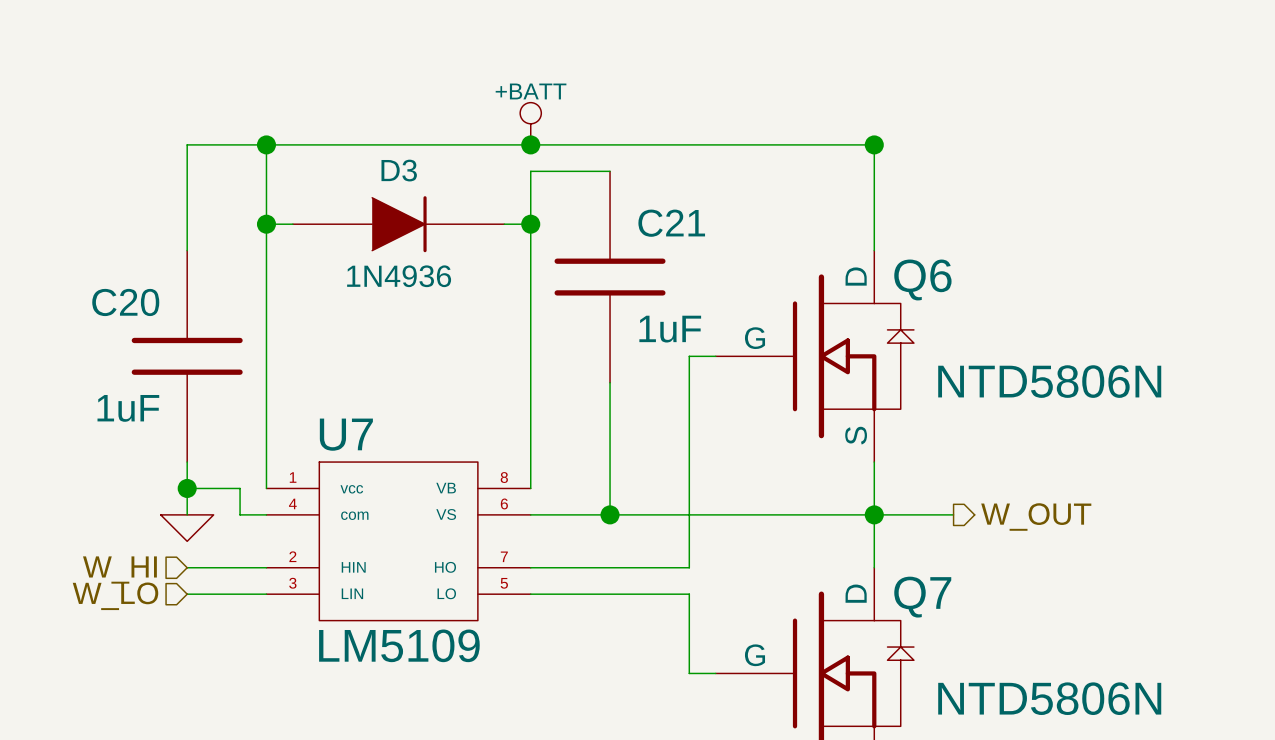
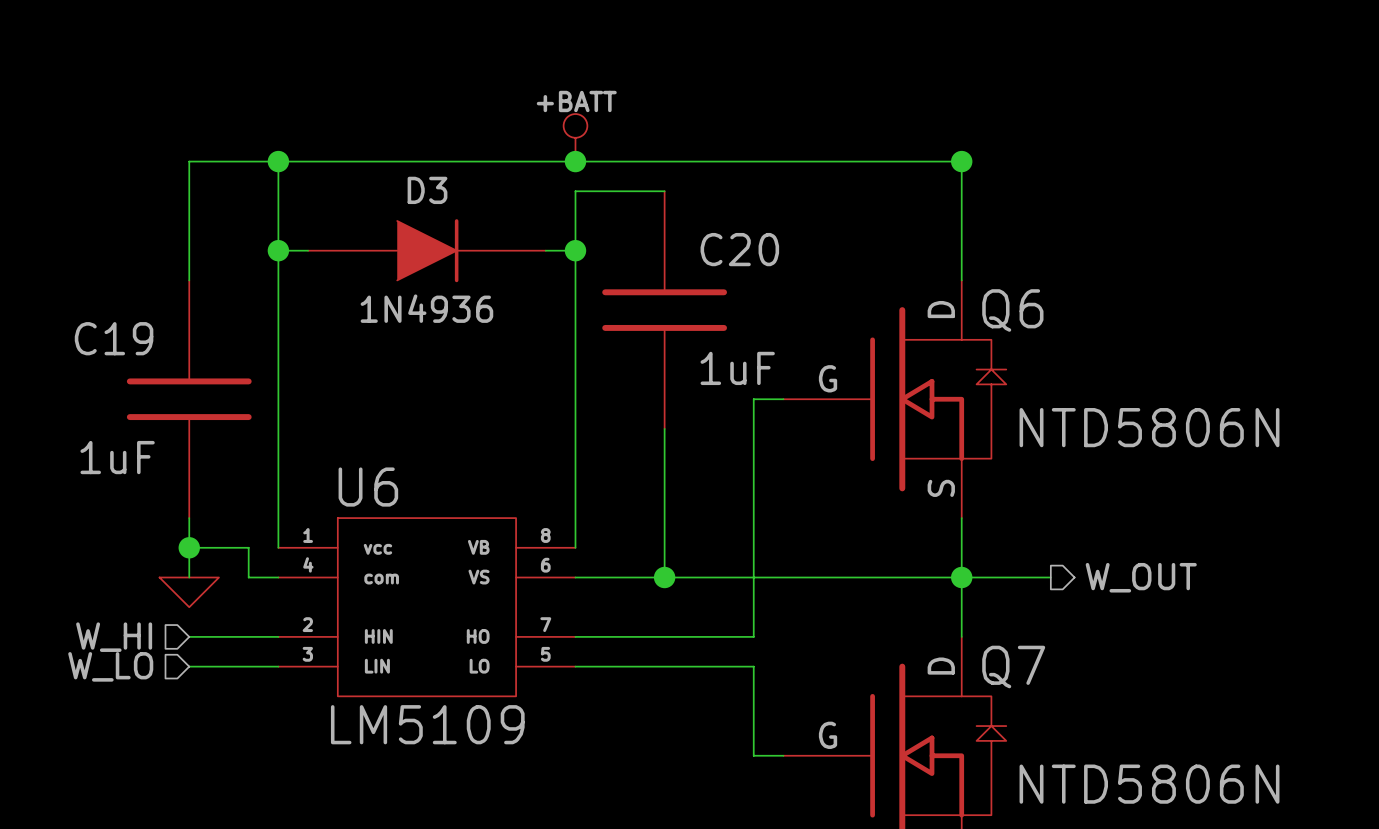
C21 name: C21 (671, 223) -> C20 (739, 249)
C20 name: C20 (125, 302) -> C19 (114, 338)
U7 name: U7 (346, 434) -> U6 (368, 487)

